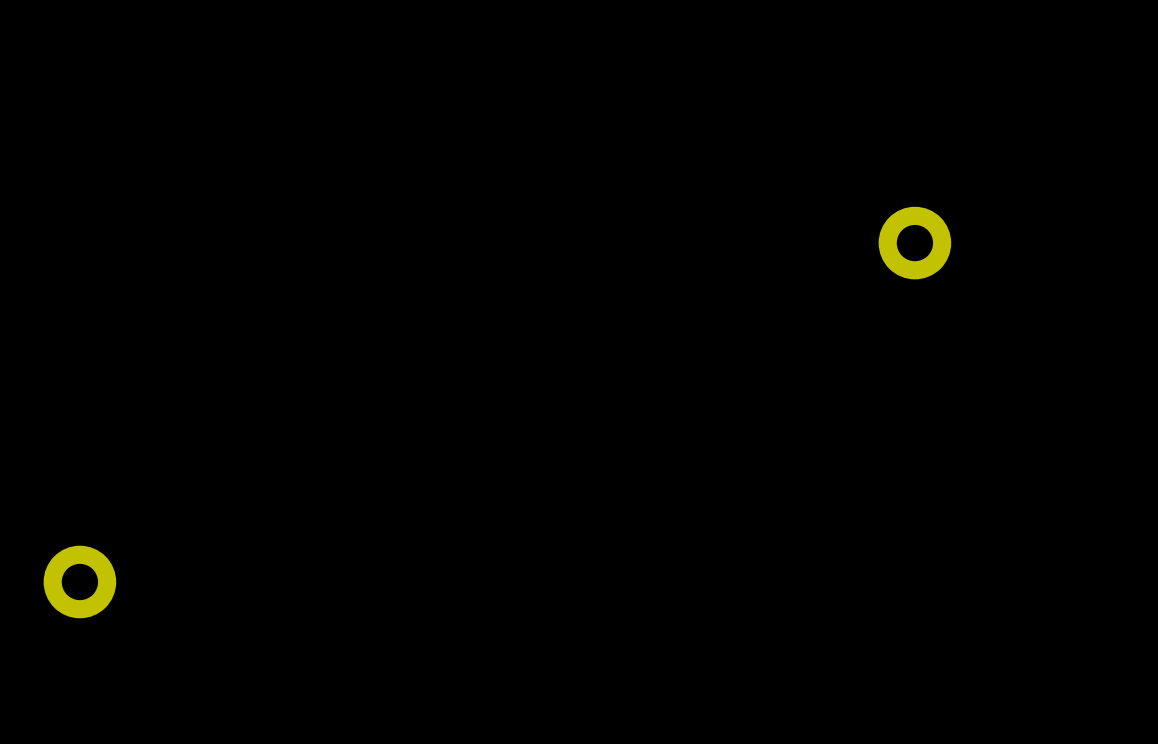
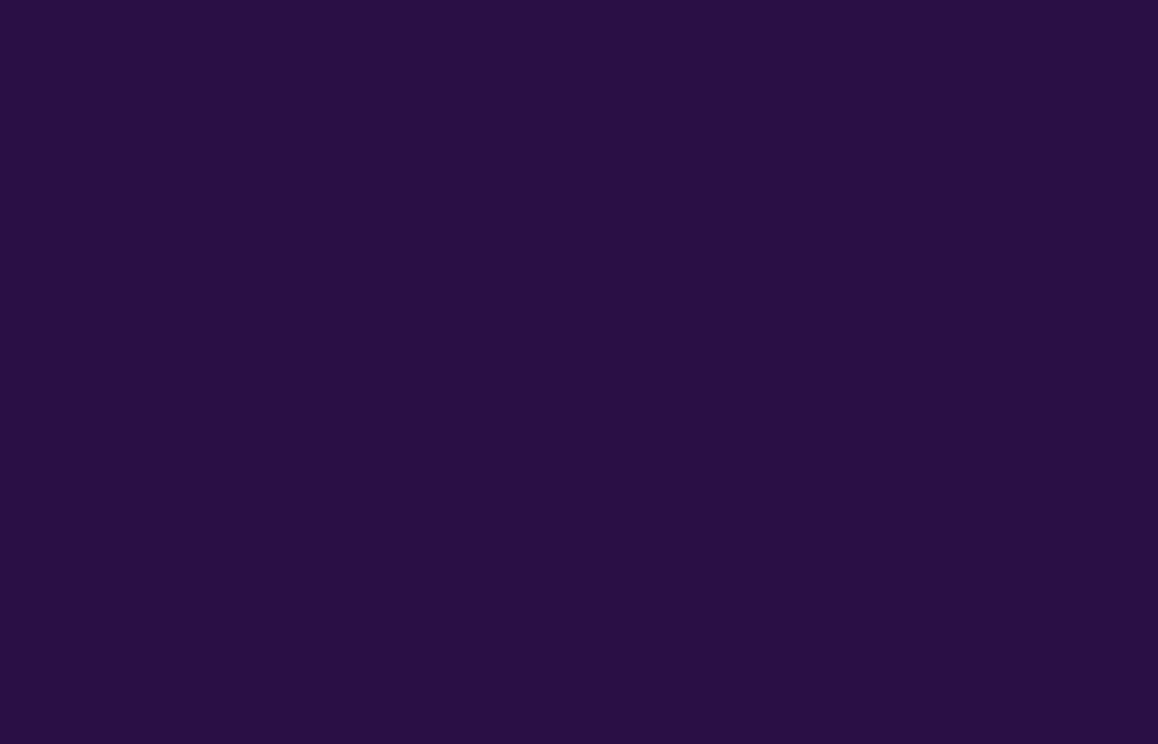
part: (914, 243) -> none
part: (79, 582) -> none

